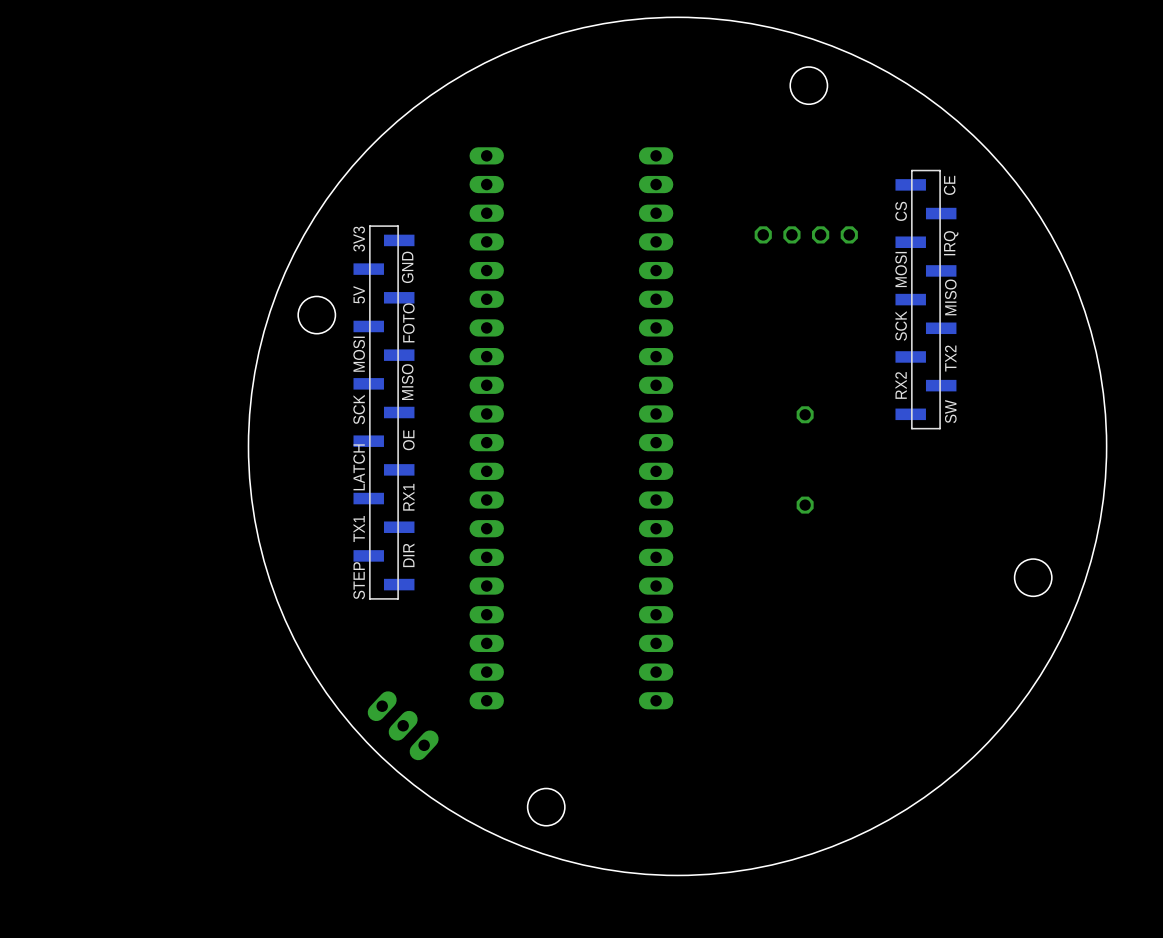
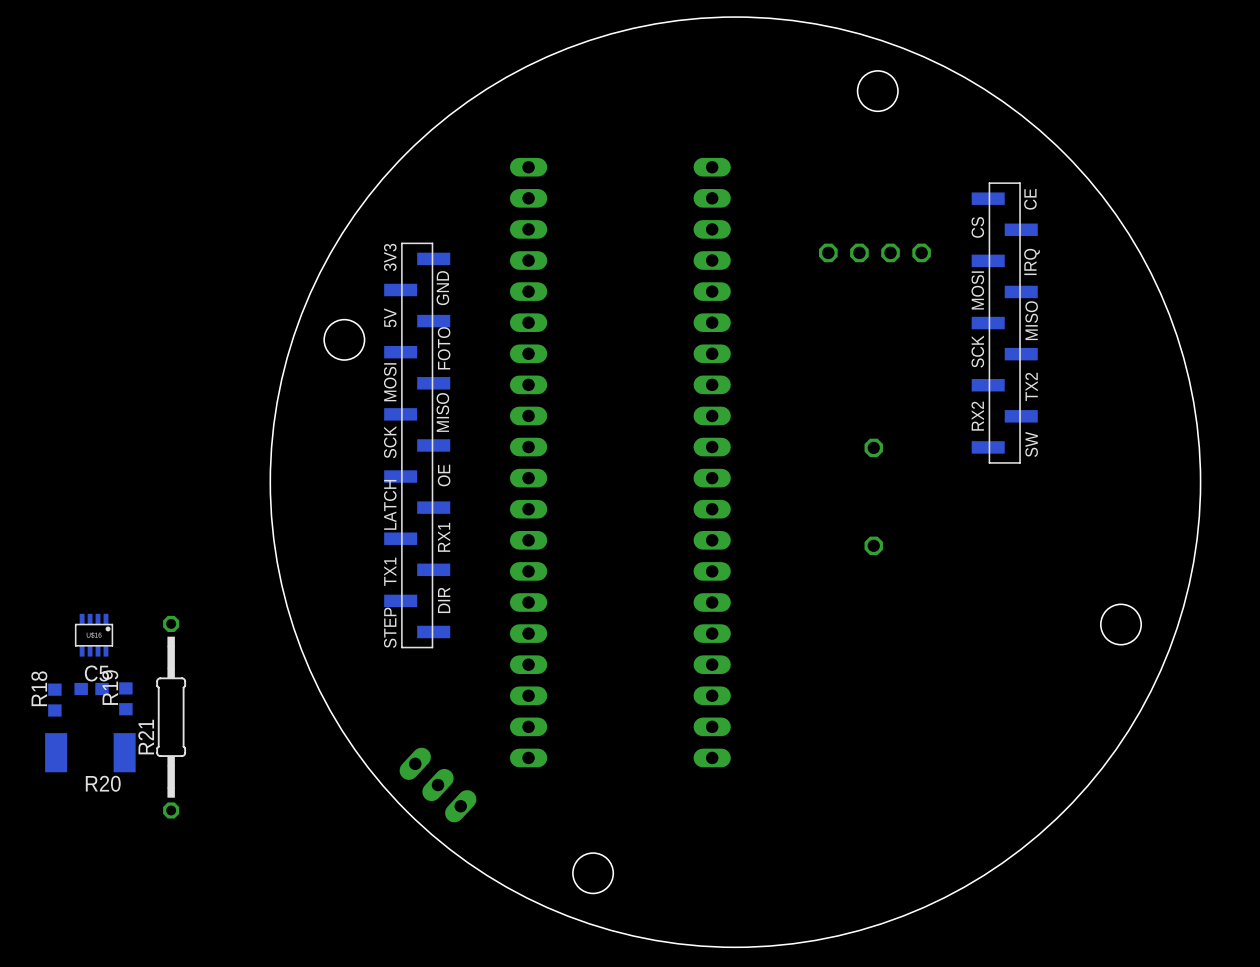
part: none -> (94, 635)
C5: none -> (91, 689)
R19: none -> (125, 698)
R18: none -> (54, 700)
R21: none -> (171, 717)
R20: none -> (90, 752)

